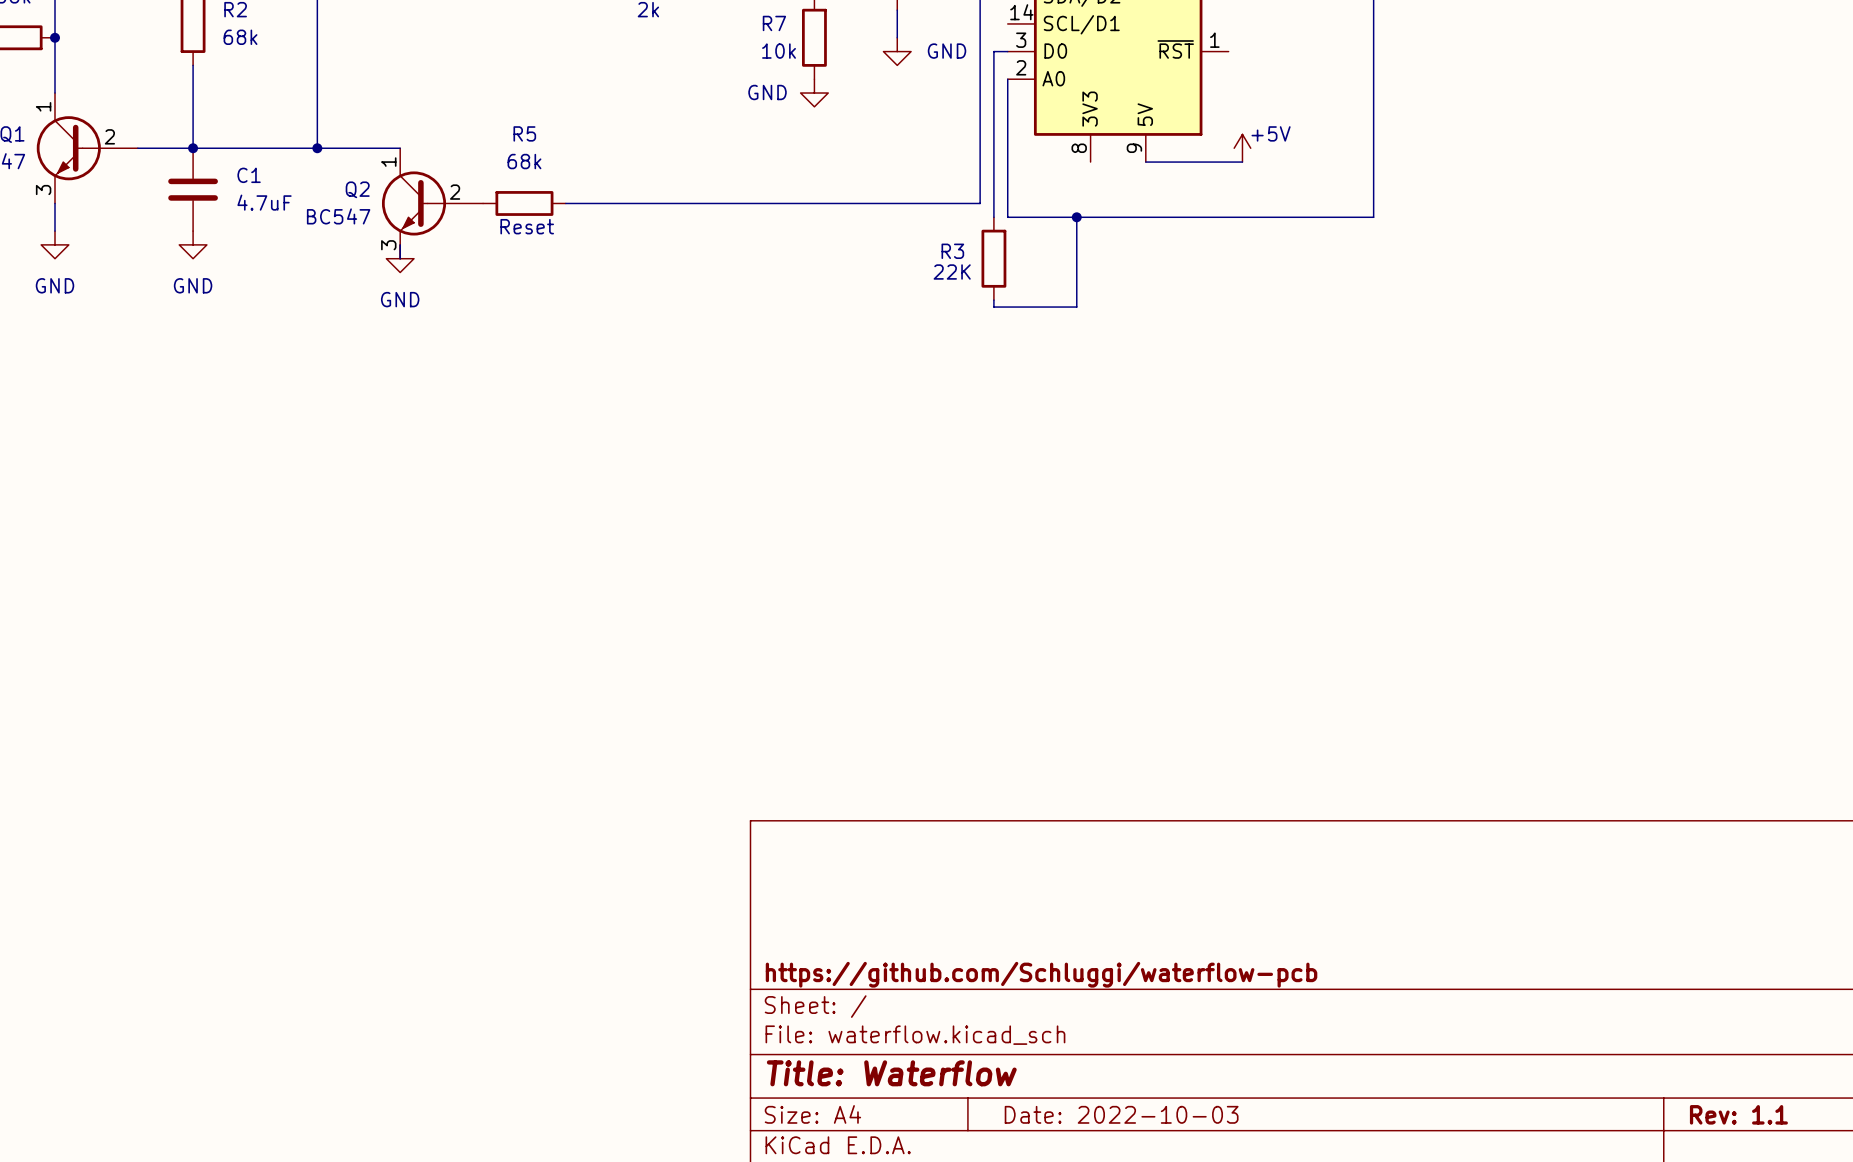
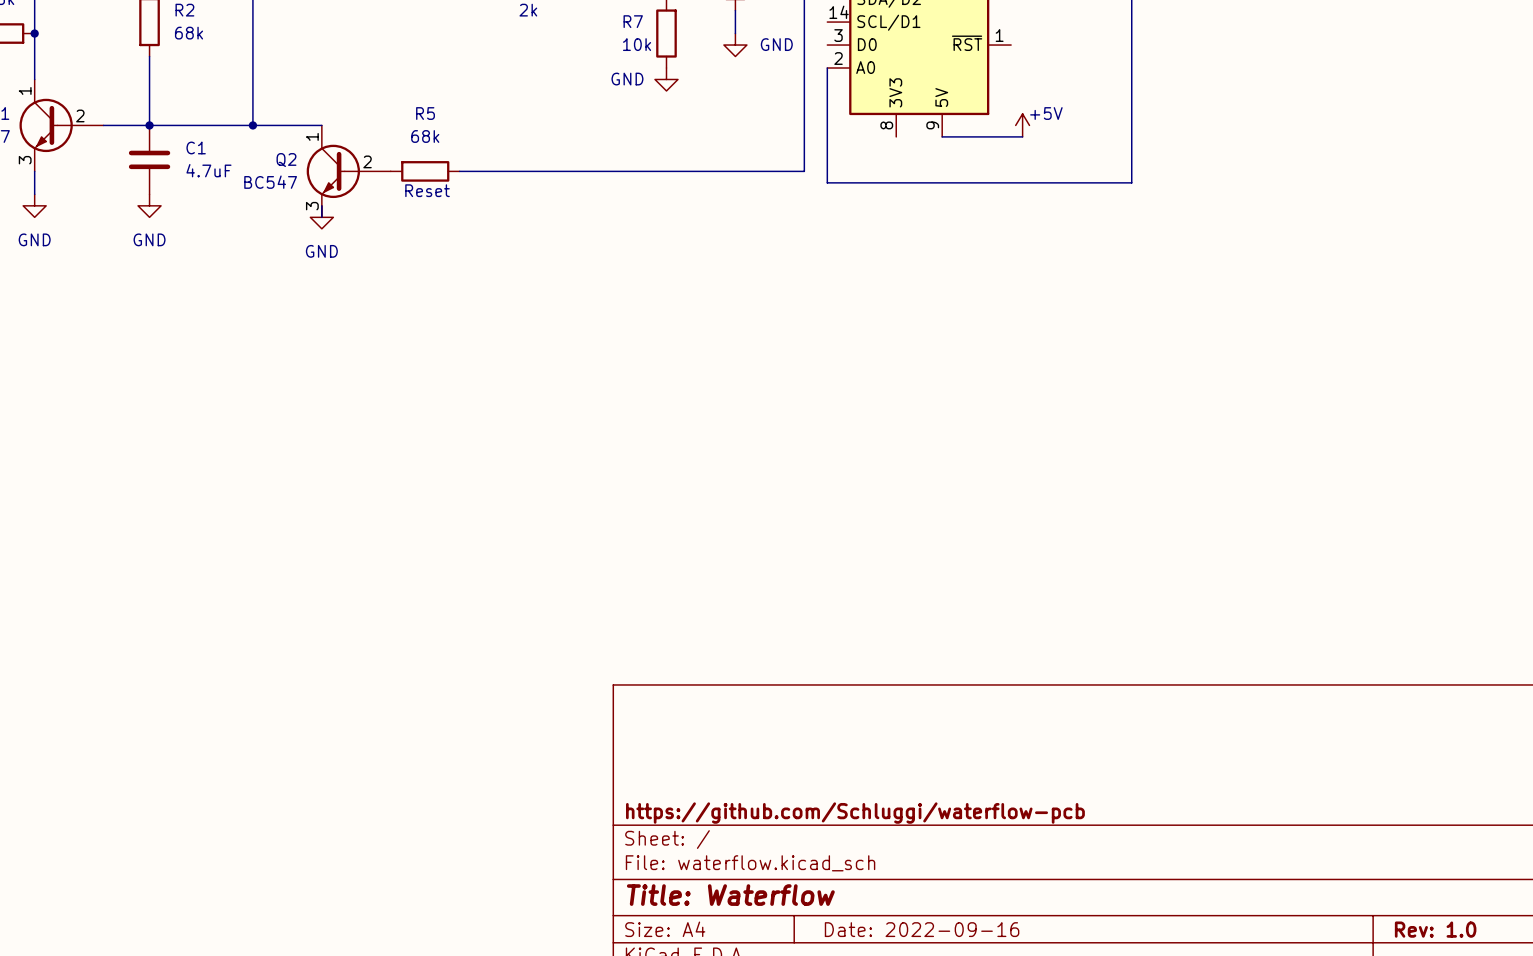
wire: (1007, 51) (993, 51) (993, 217) -> none
wire: (1076, 217) (1076, 307) (993, 307) (993, 300) -> none
junction: (1076, 217) -> none
R3: 22K (993, 258) -> none
title block: Date: 2022-10-03 (1121, 1114) -> Date: 2022-09-16 (922, 929)
title block: Rev: 1.1 (1738, 1114) -> Rev: 1.0 (1435, 929)

